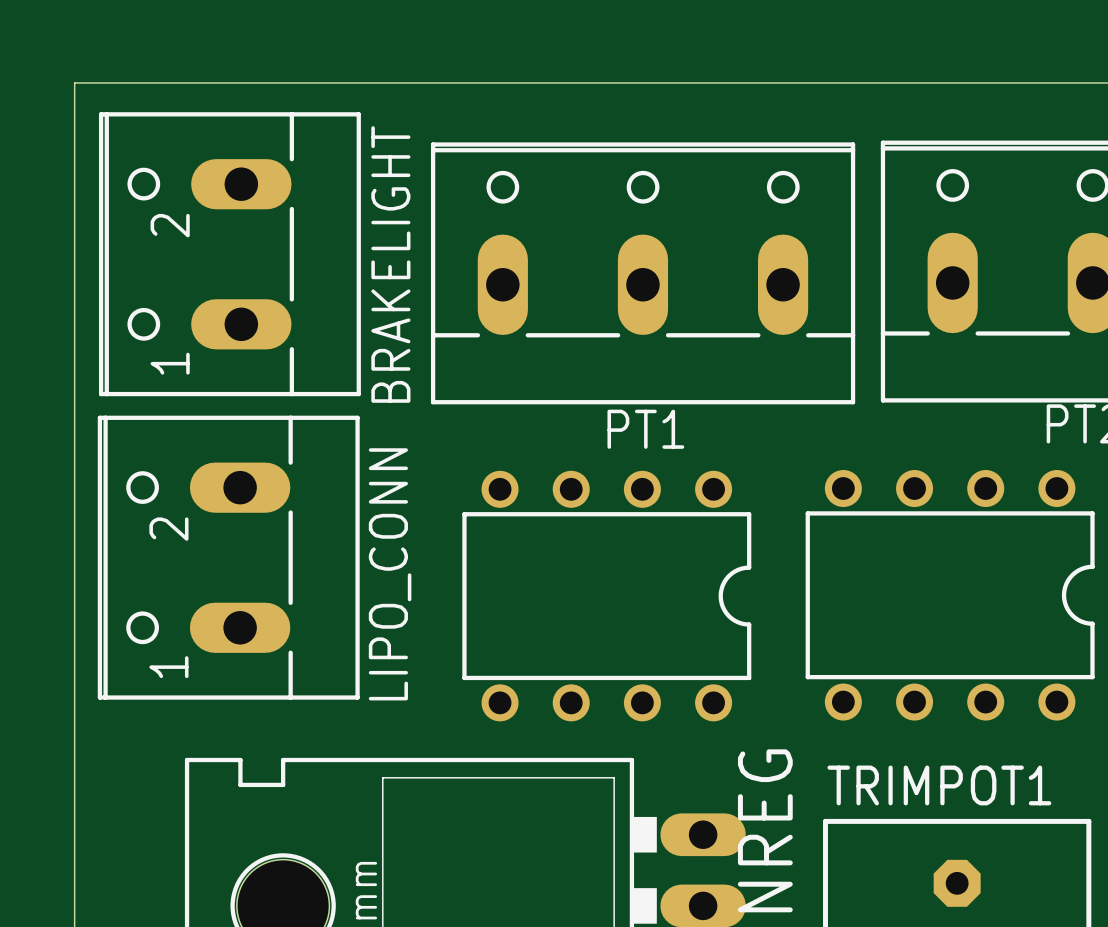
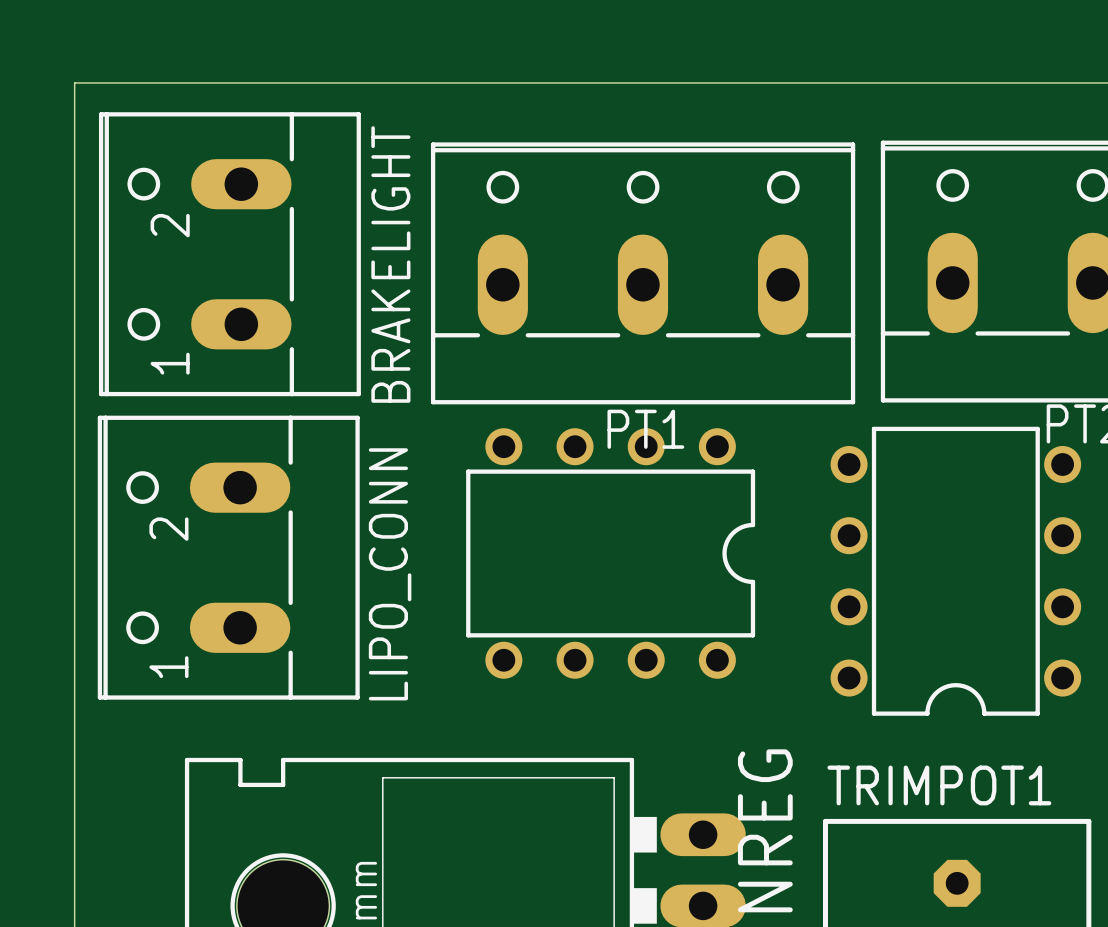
part rotation: 0° (950, 595) -> 90° clockwise (955, 571)
part position: (606, 596) -> (610, 553)

